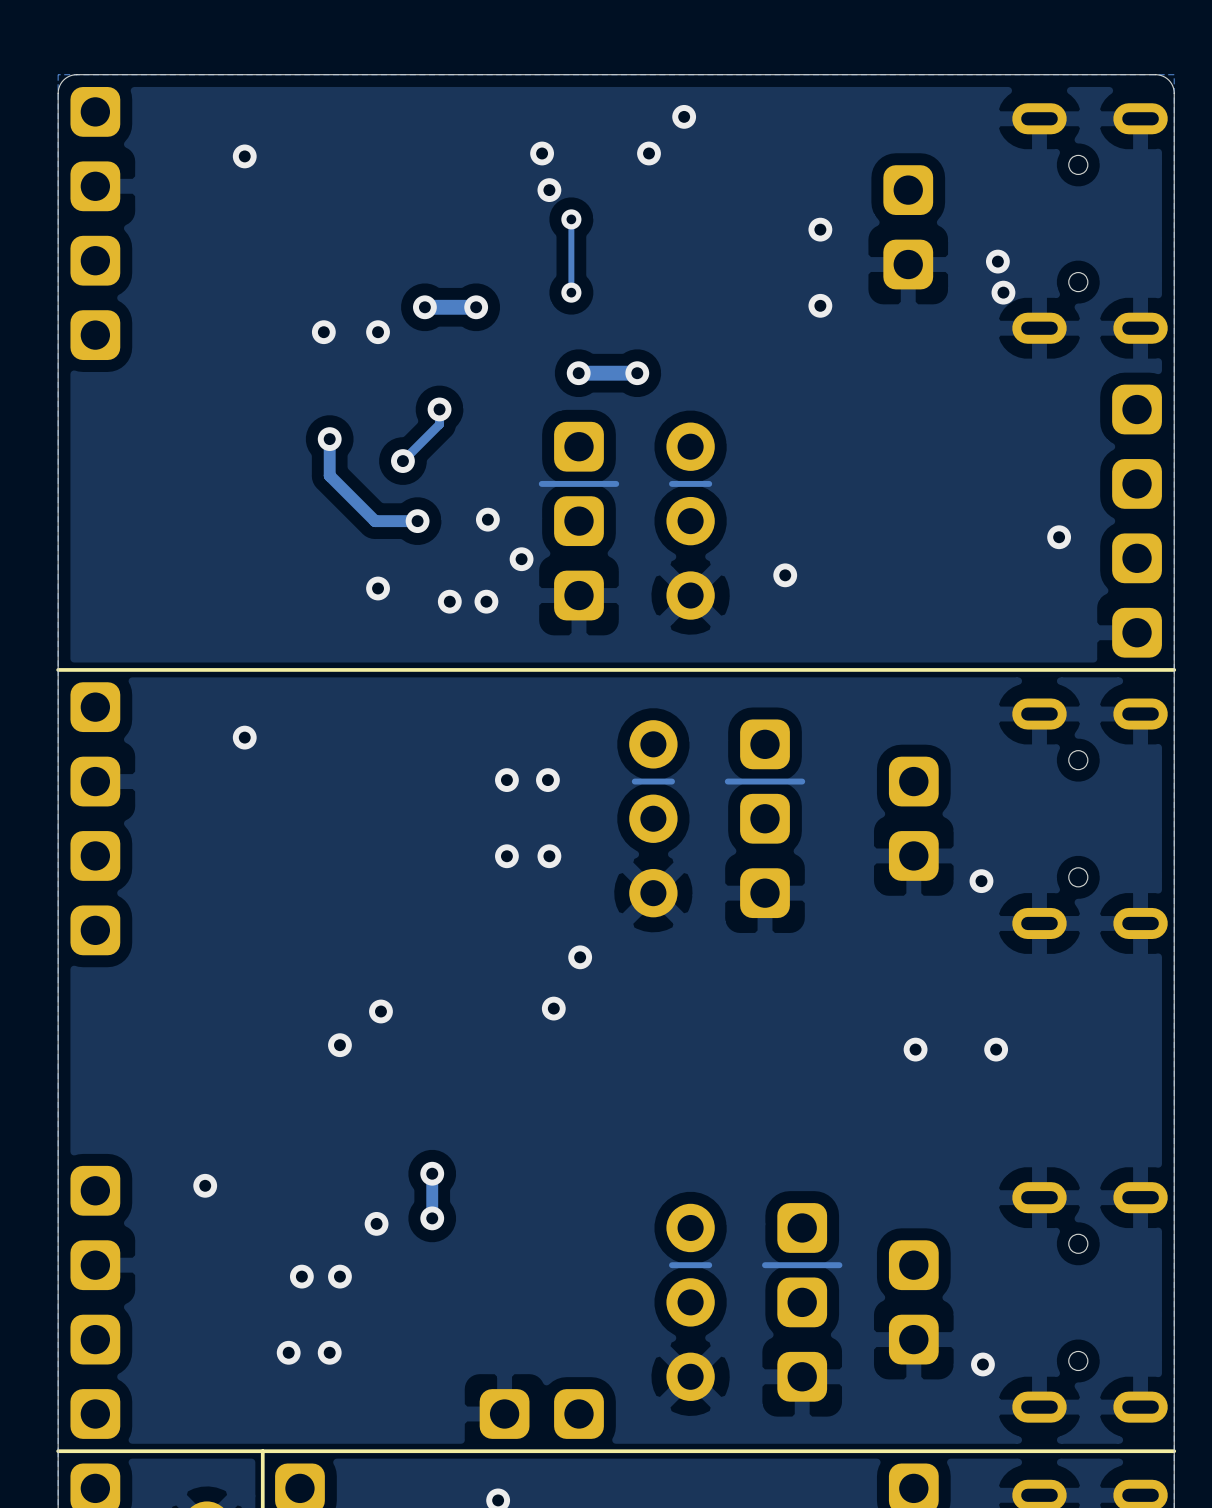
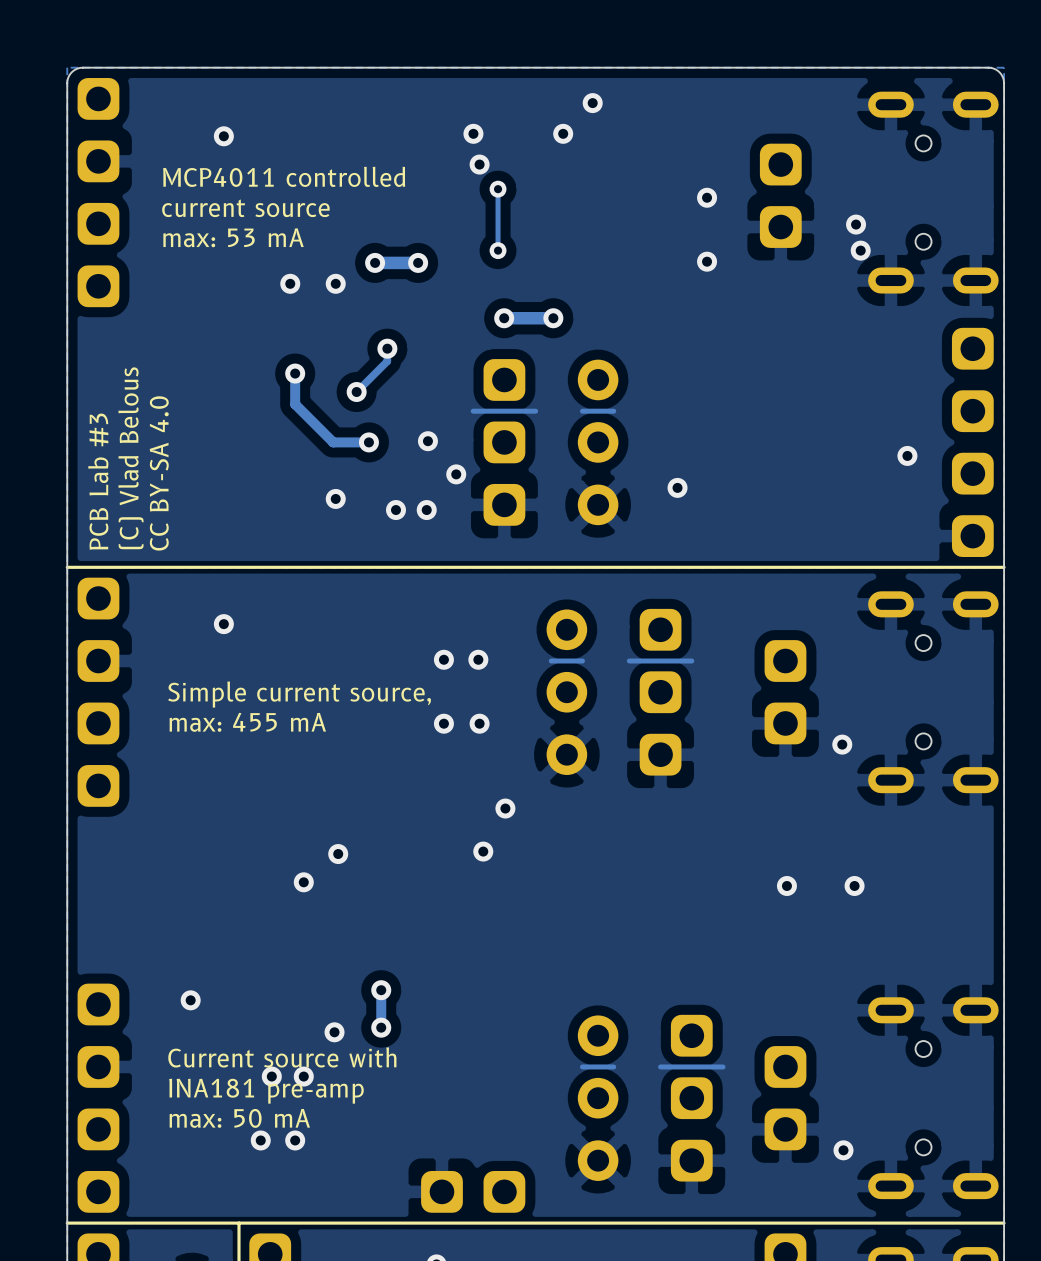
text: none -> MCP4011 controlled (284, 176)
text: none -> current source (245, 208)
text: none -> max: 53 mA (233, 237)
text: none -> (C) Vlad Belous (130, 458)
text: none -> CC BY-SA 4.0 (159, 473)
text: none -> PCB Lab #3 (98, 481)
text: none -> Simple current source, (299, 694)
text: none -> max: 455 mA (247, 722)
text: none -> Current source with (282, 1057)
text: none -> INA181 pre-amp (266, 1091)
text: none -> max: 50 mA (239, 1118)

